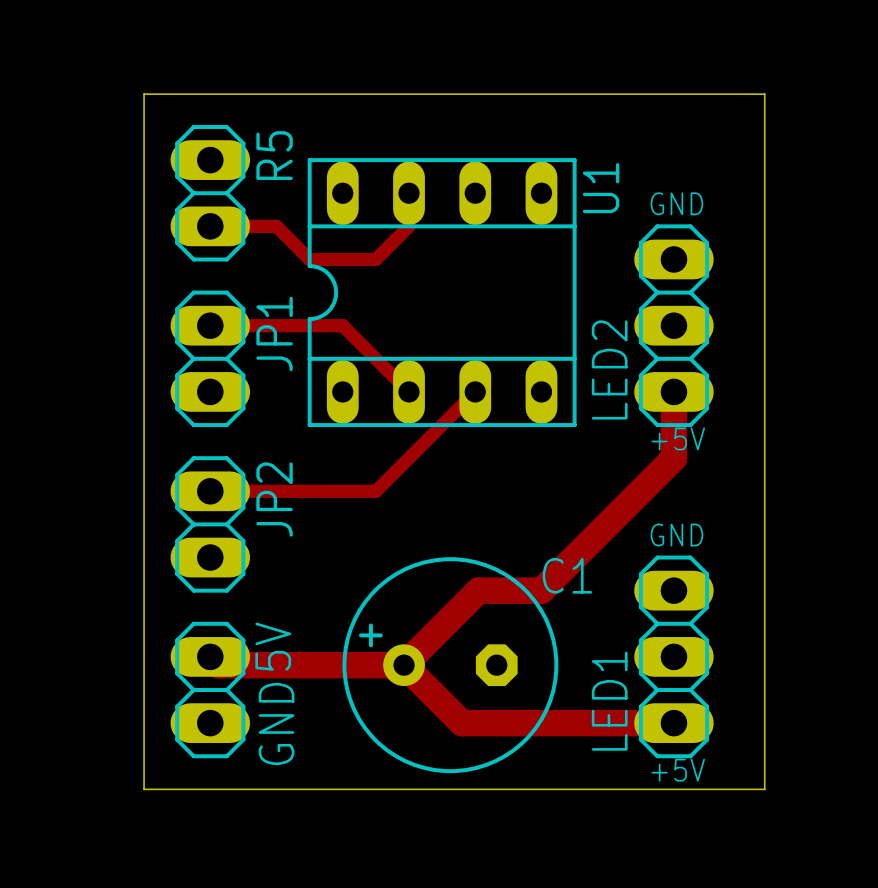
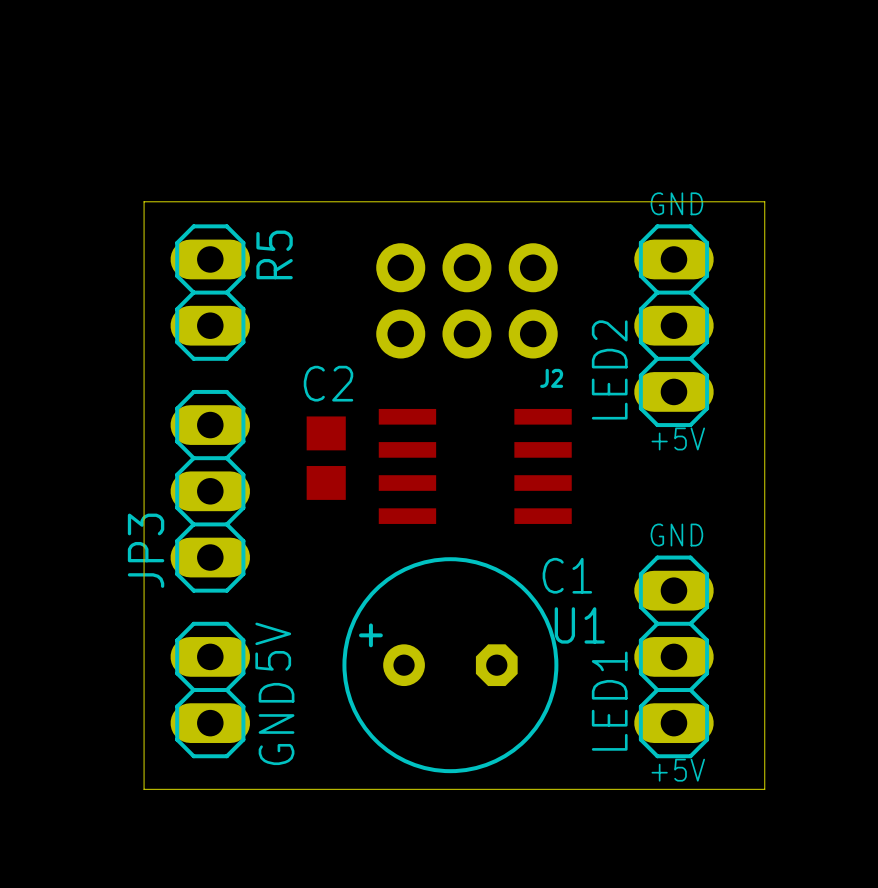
U1 footprint: [307, 158, 577, 428] -> [378, 408, 572, 524]
U1 name position: U1 (601, 188) -> U1 (579, 625)
R5 position: (210, 193) -> (210, 292)
track: (409, 193) (409, 226) (375, 259) (309, 259) (276, 226) (210, 226) -> none
board edge: (144, 201) (144, 94) (764, 94) (764, 201) -> (144, 201) (764, 201)
J2: none -> (466, 300)
track: (210, 325) (342, 325) (409, 391) -> none
JP1: (210, 358) -> none
track: (475, 391) (375, 491) (210, 491) -> none
track: (673, 391) (673, 458) (541, 590) (478, 590) (404, 665) -> none
C2: none -> (326, 458)
JP3: none -> (210, 491)
JP2: (210, 524) -> none
track: (210, 656) (218, 665) (404, 665) -> none
track: (404, 665) (462, 723) (673, 723) -> none

